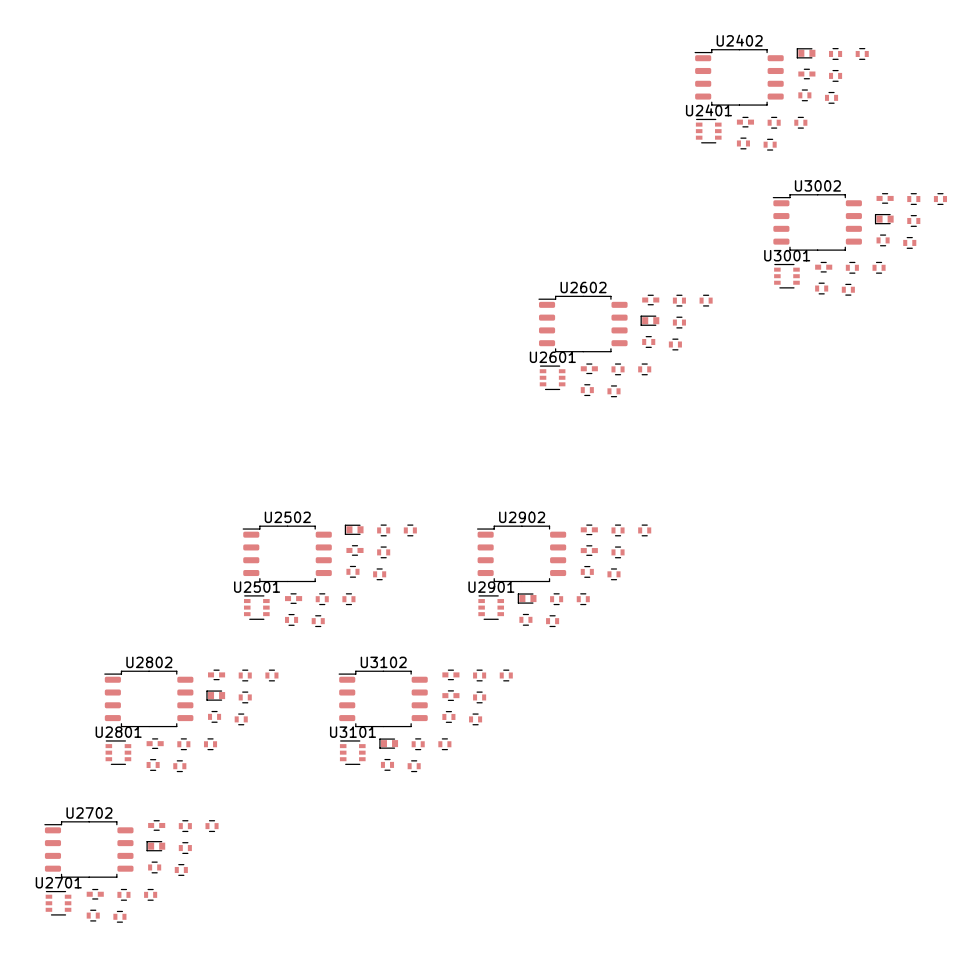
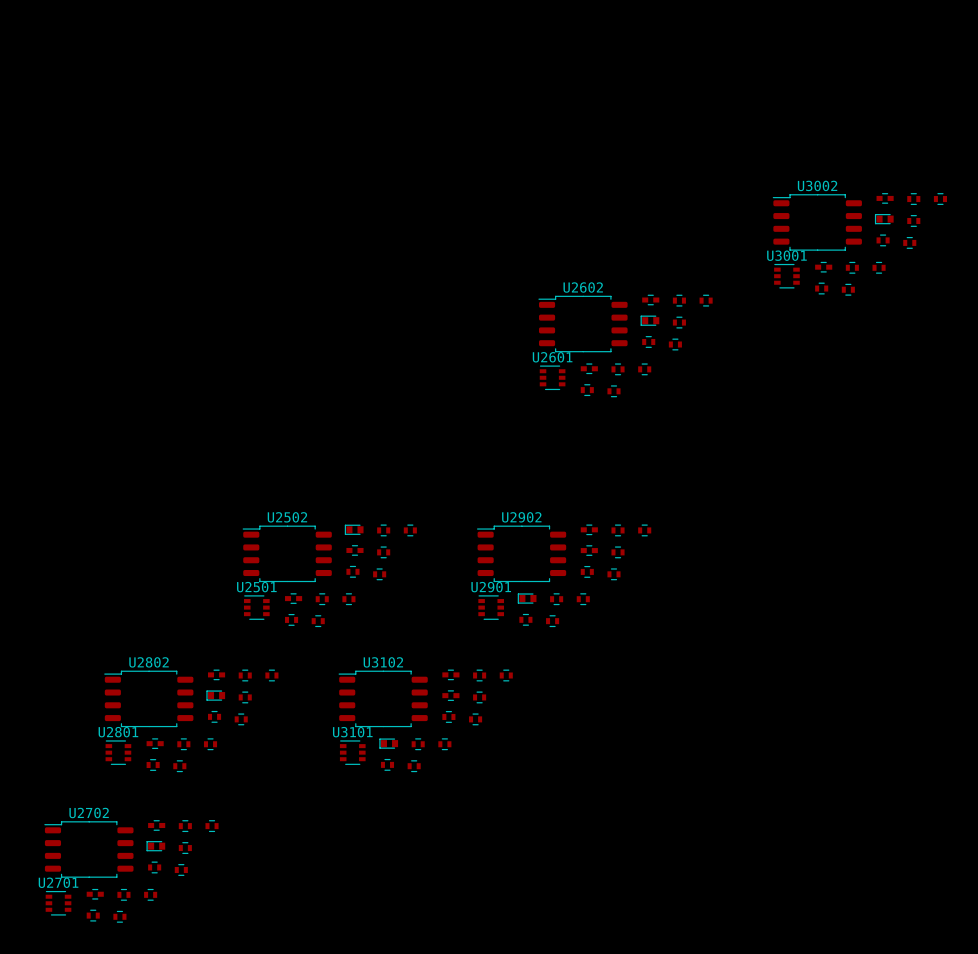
part: (806, 53) -> none
part: (835, 53) -> none
part: (862, 53) -> none
part: (806, 74) -> none
part: (835, 75) -> none
U2402: (739, 77) -> none
part: (804, 95) -> none
part: (831, 97) -> none
part: (745, 122) -> none
part: (774, 122) -> none
part: (800, 122) -> none
U2401: (708, 131) -> none
part: (743, 143) -> none
part: (770, 144) -> none

